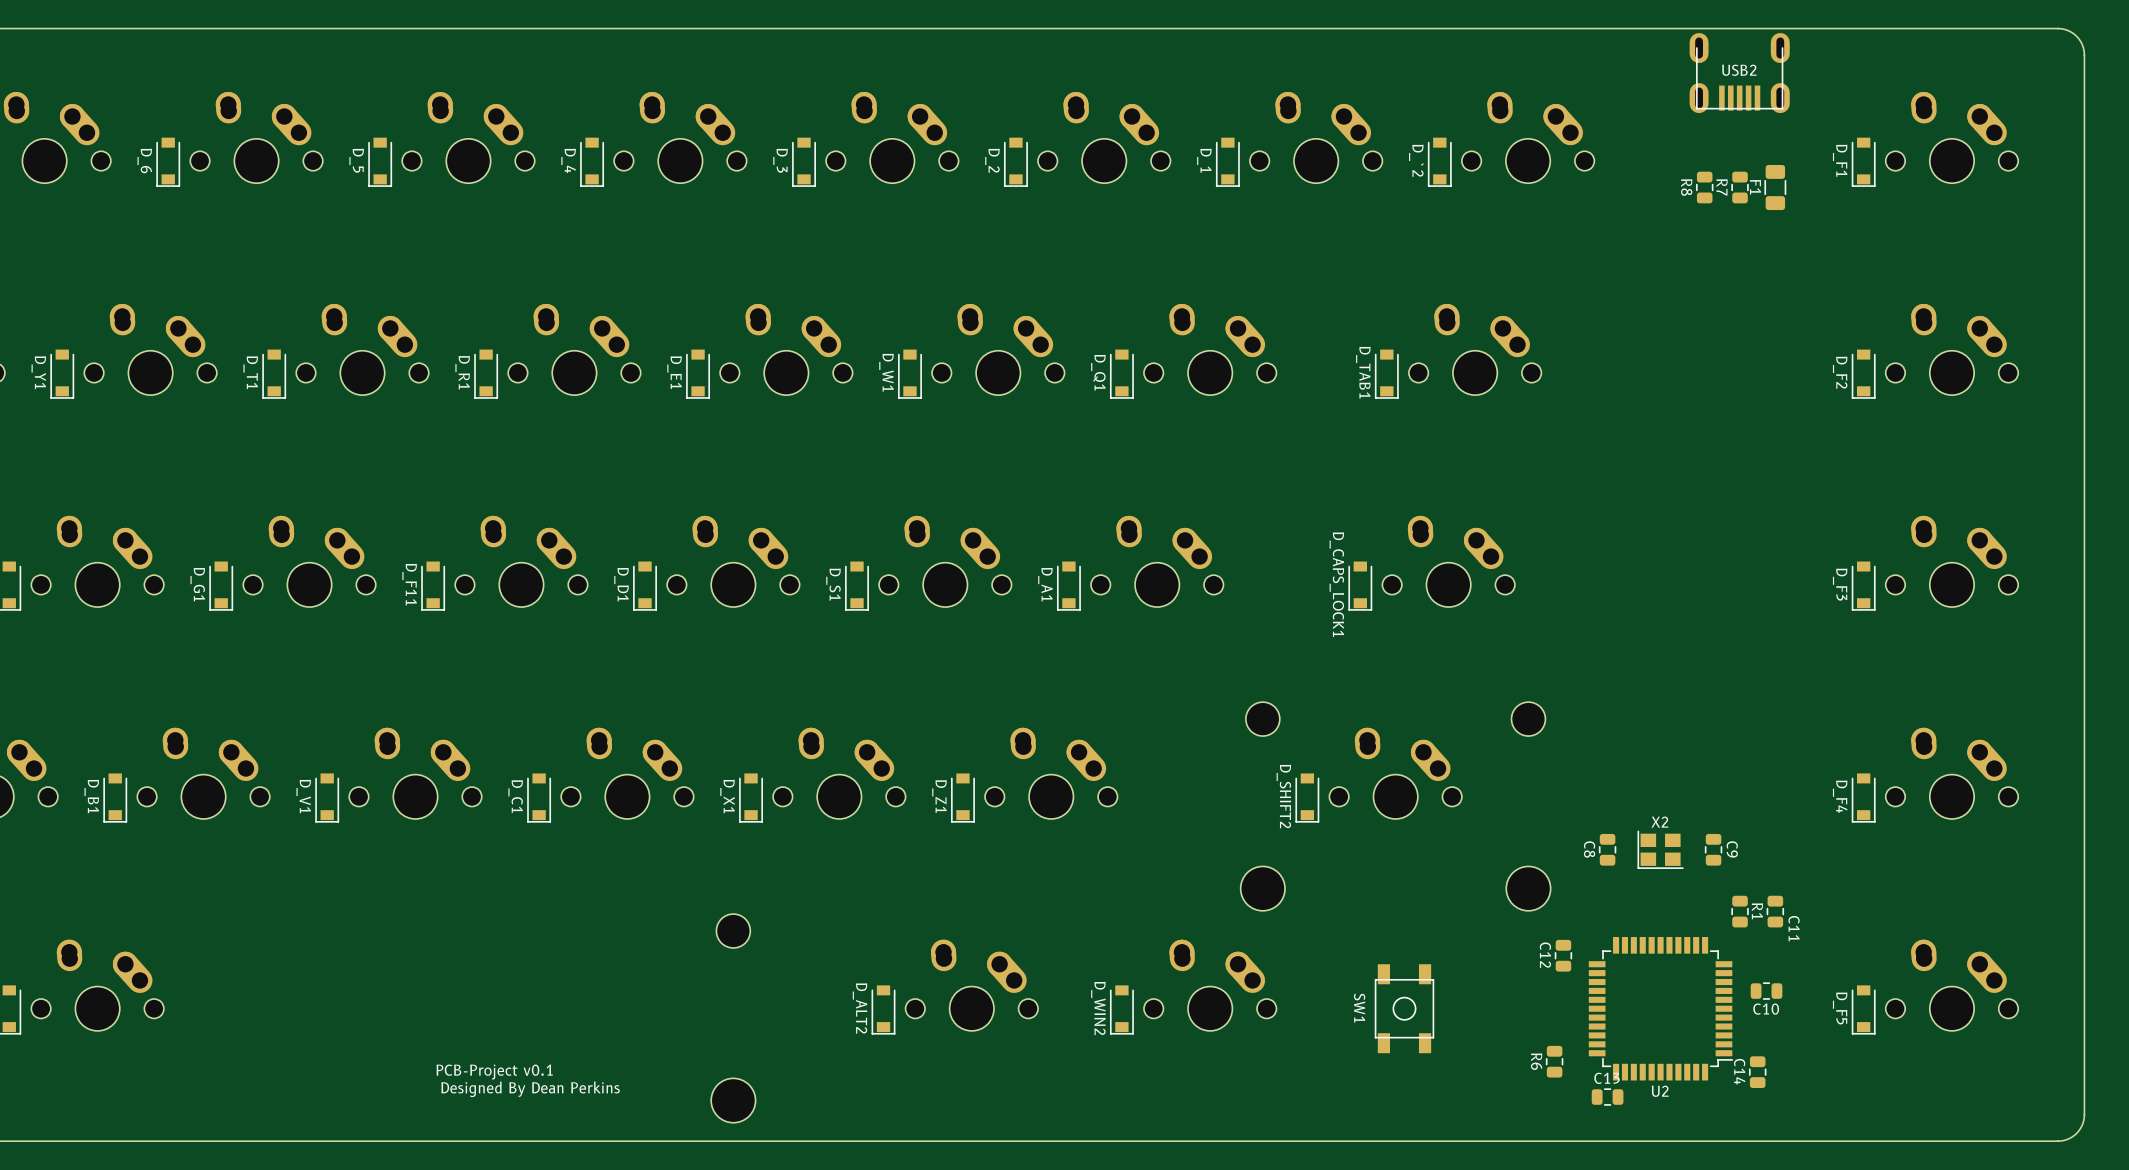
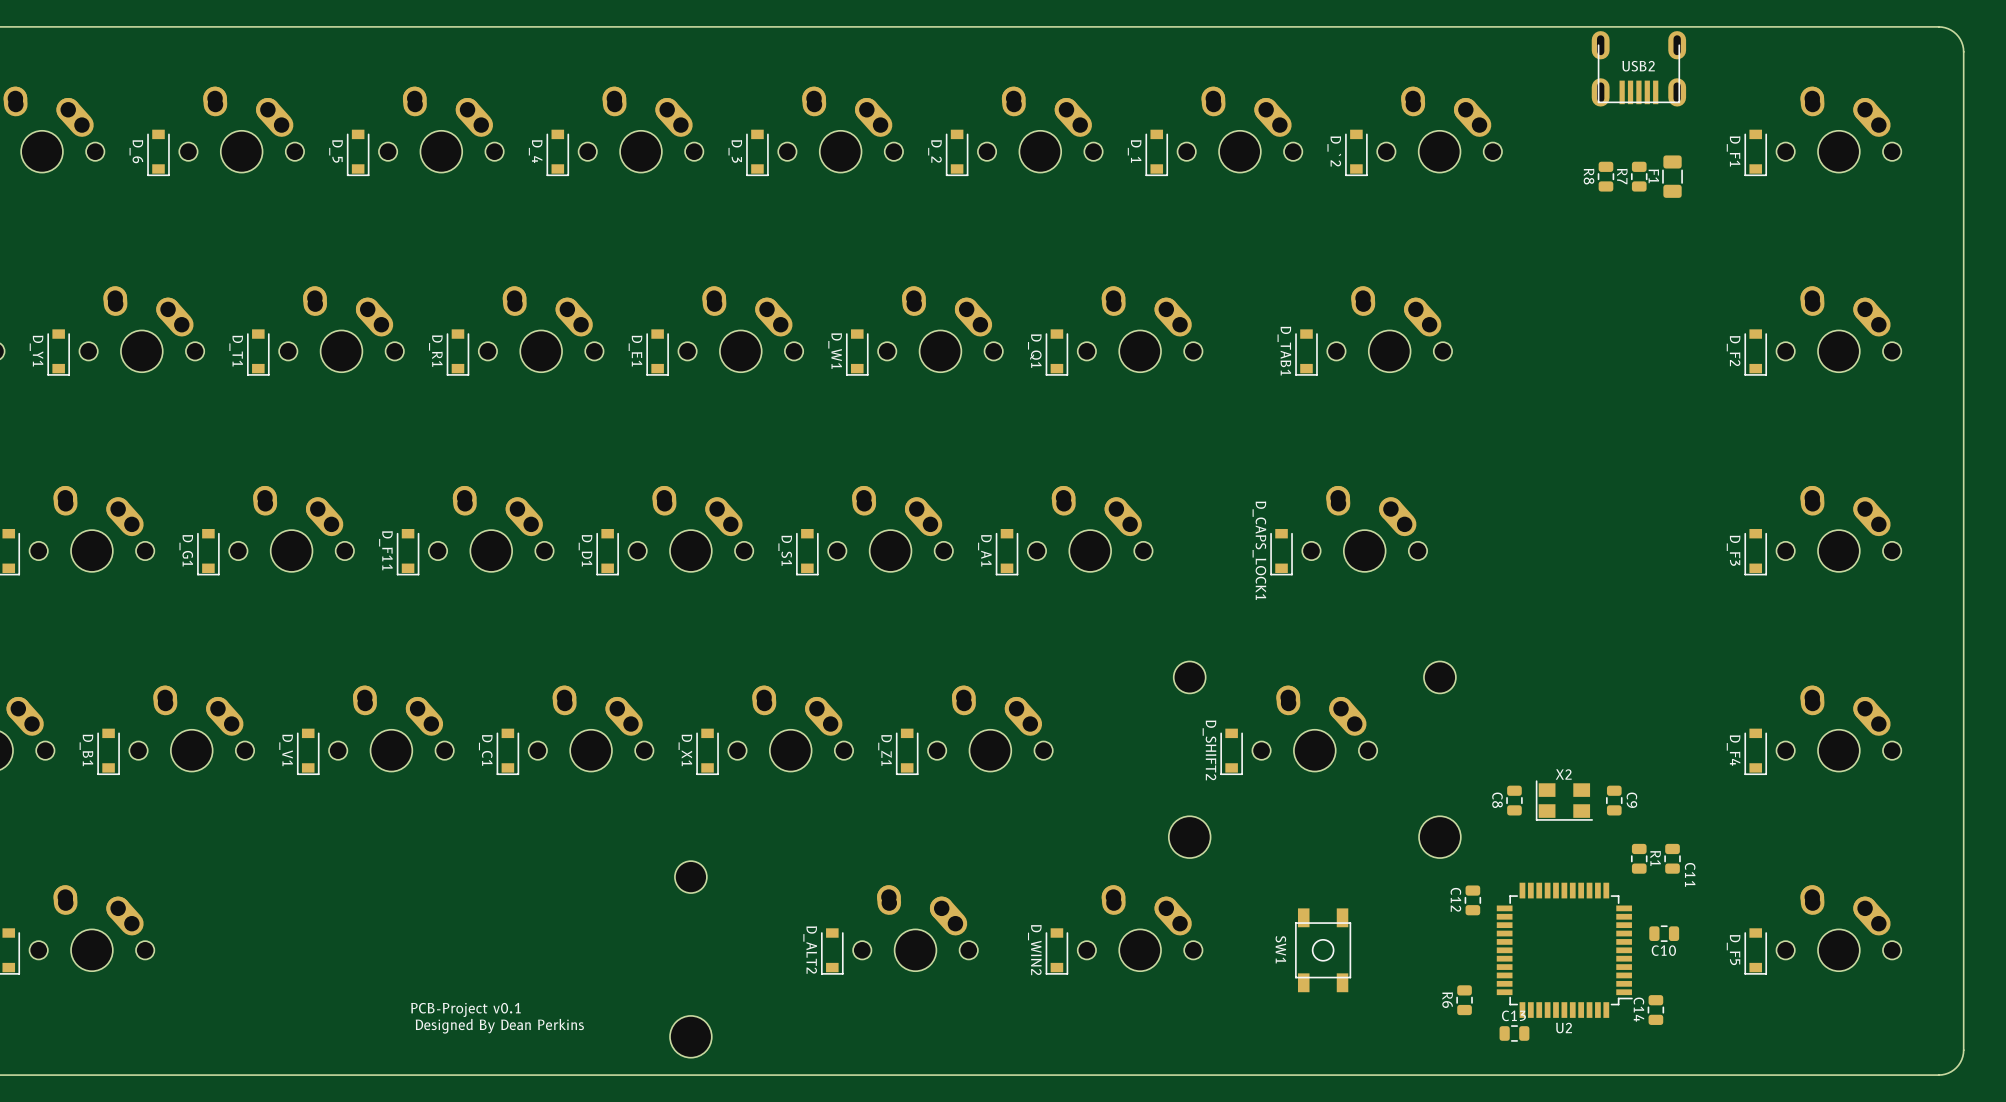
X2 footprint: [1637, 830, 1684, 869] -> [1535, 780, 1593, 821]

